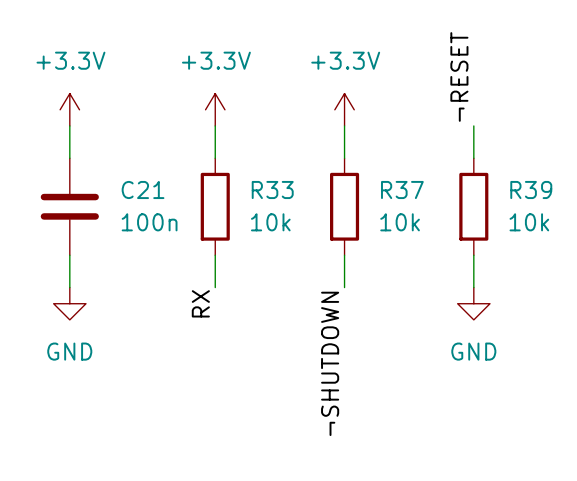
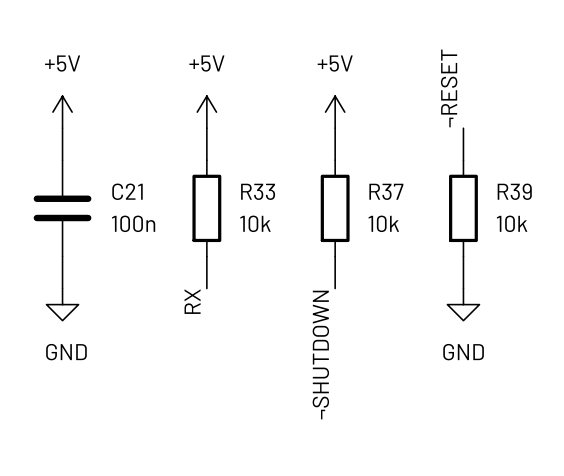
power symbol: +3.3V (69, 109) -> +5V (62, 112)
power symbol: +3.3V (215, 109) -> +5V (206, 112)
power symbol: +3.3V (344, 109) -> +5V (335, 112)

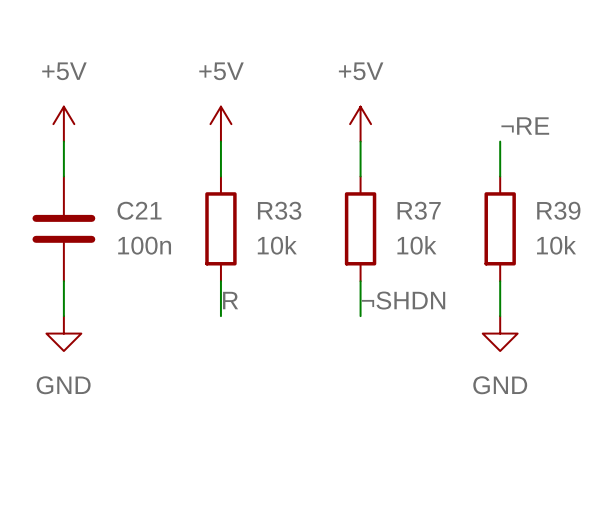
label: ¬RESET (449, 88) -> ¬RE (525, 126)
label: RX (192, 301) -> R (230, 300)
label: ¬SHUTDOWN (320, 355) -> ¬SHDN (403, 300)

